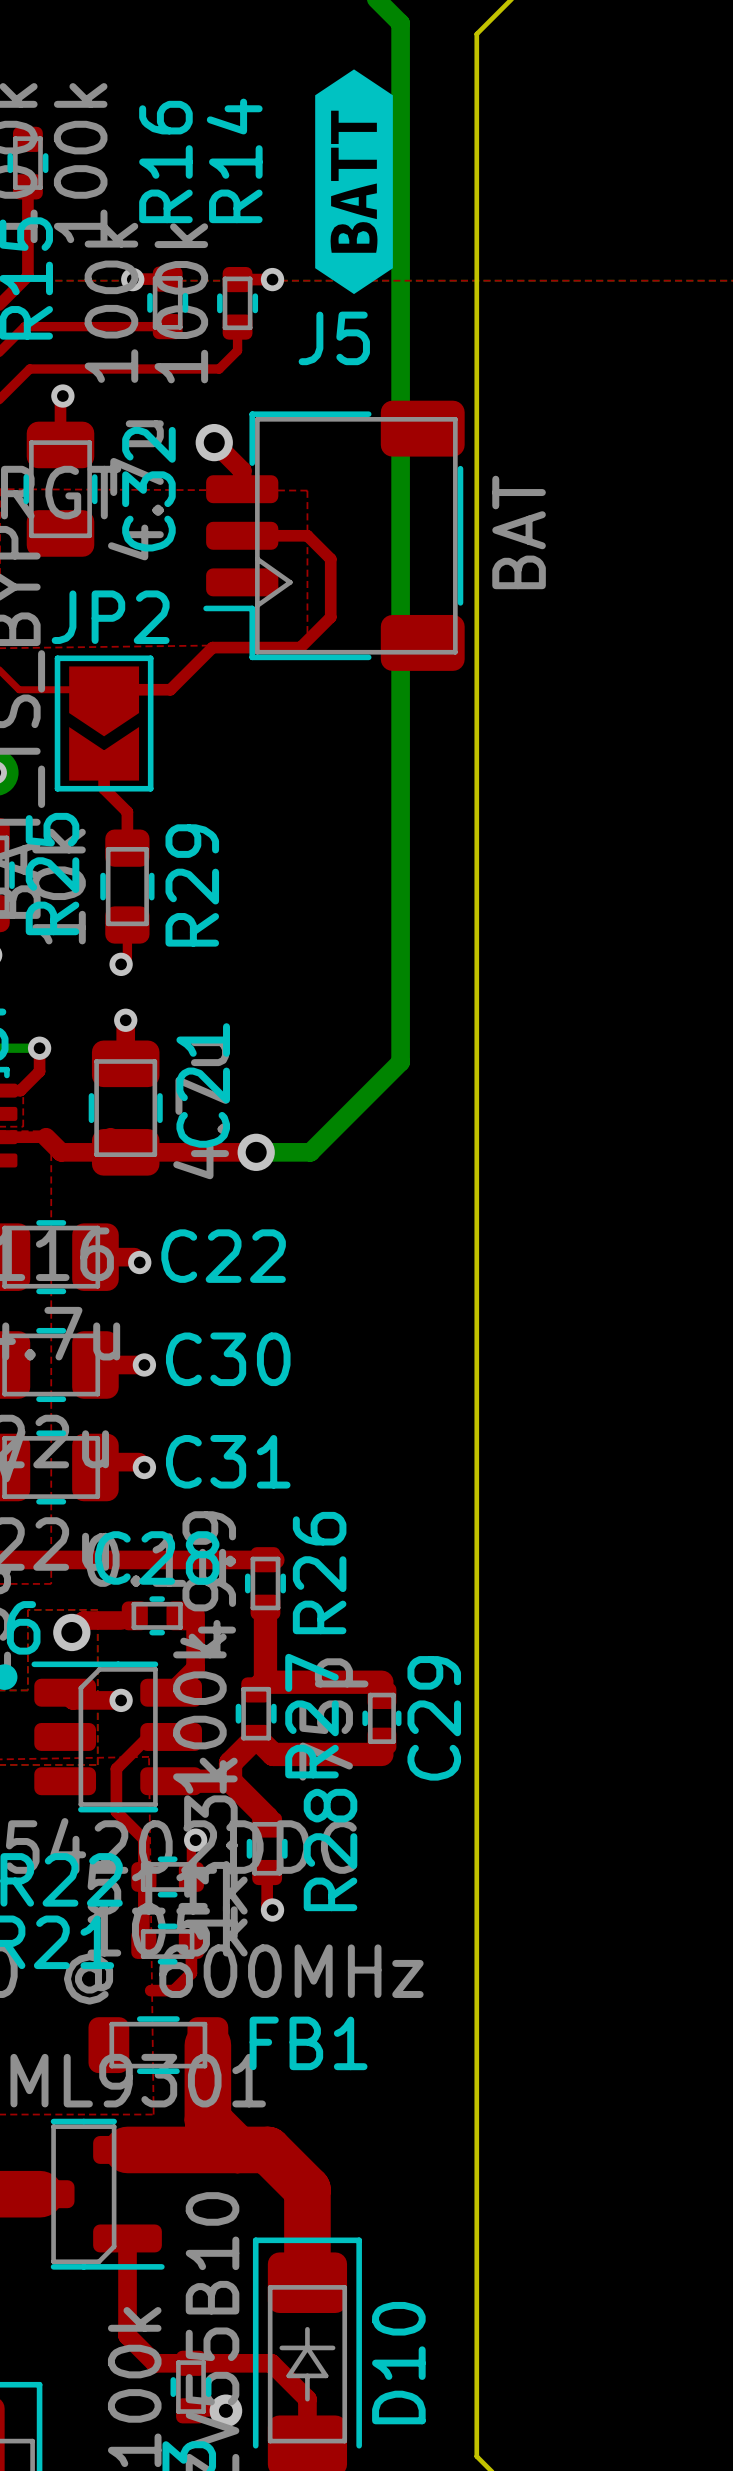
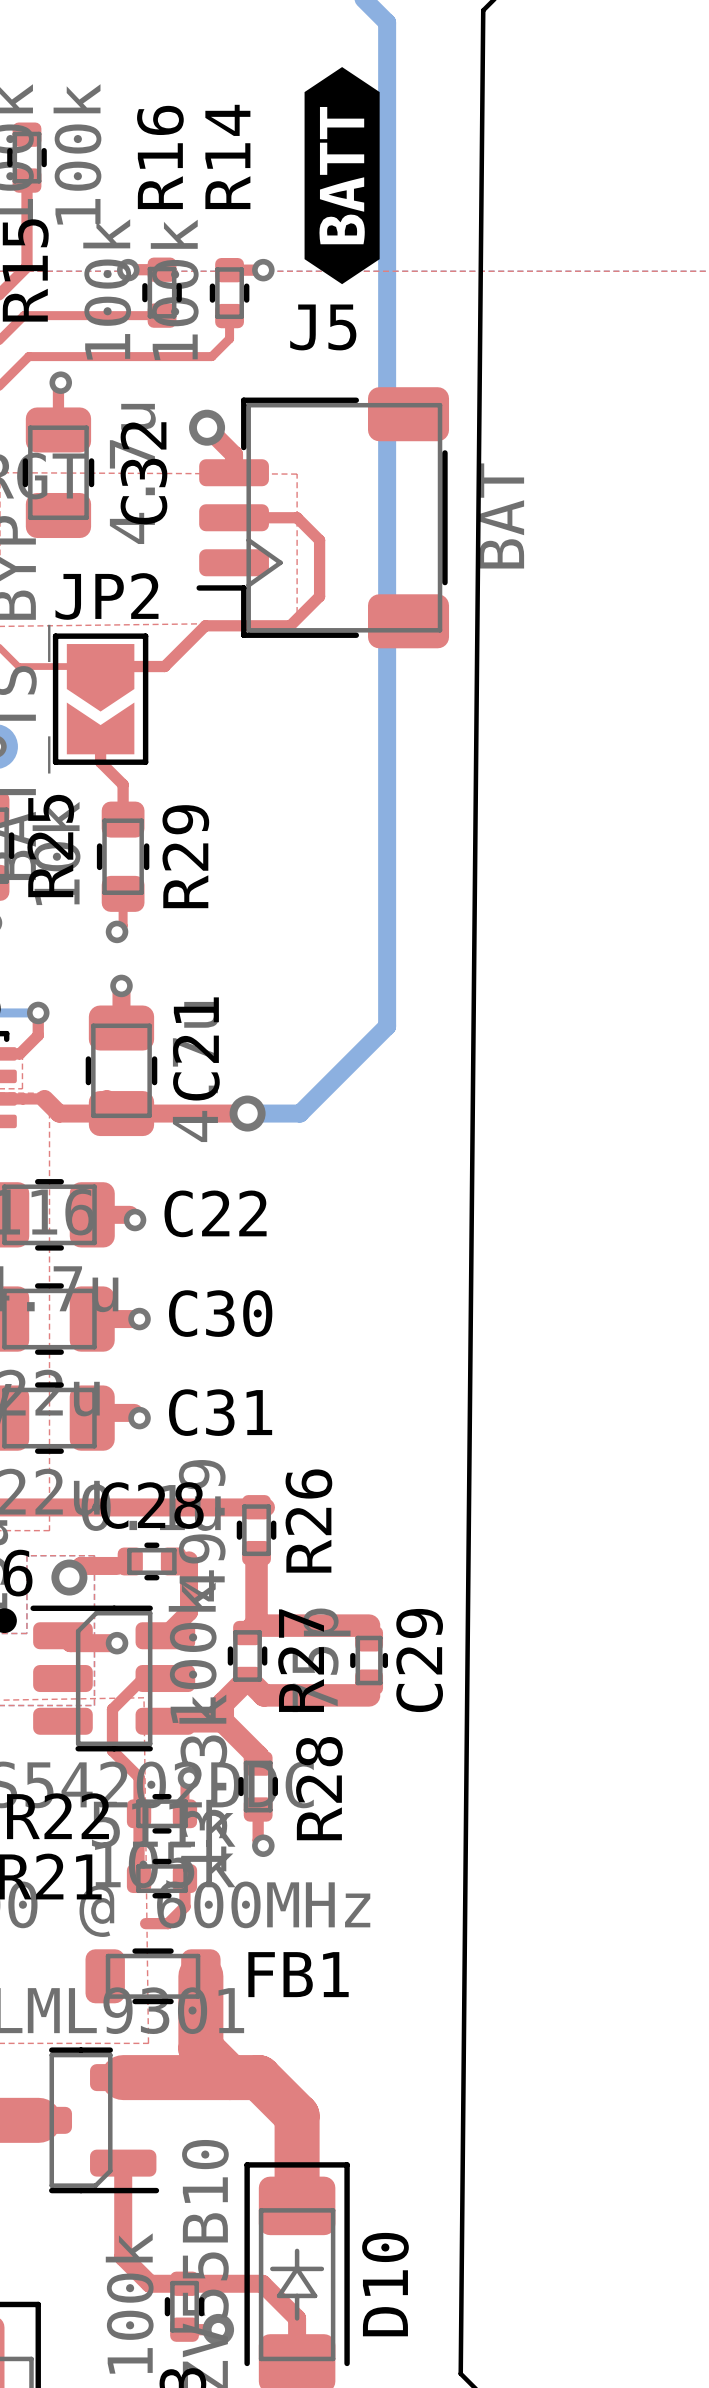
board edge: (500, 10) (476, 34) (476, 2456) -> (483, 10) (460, 2373)

